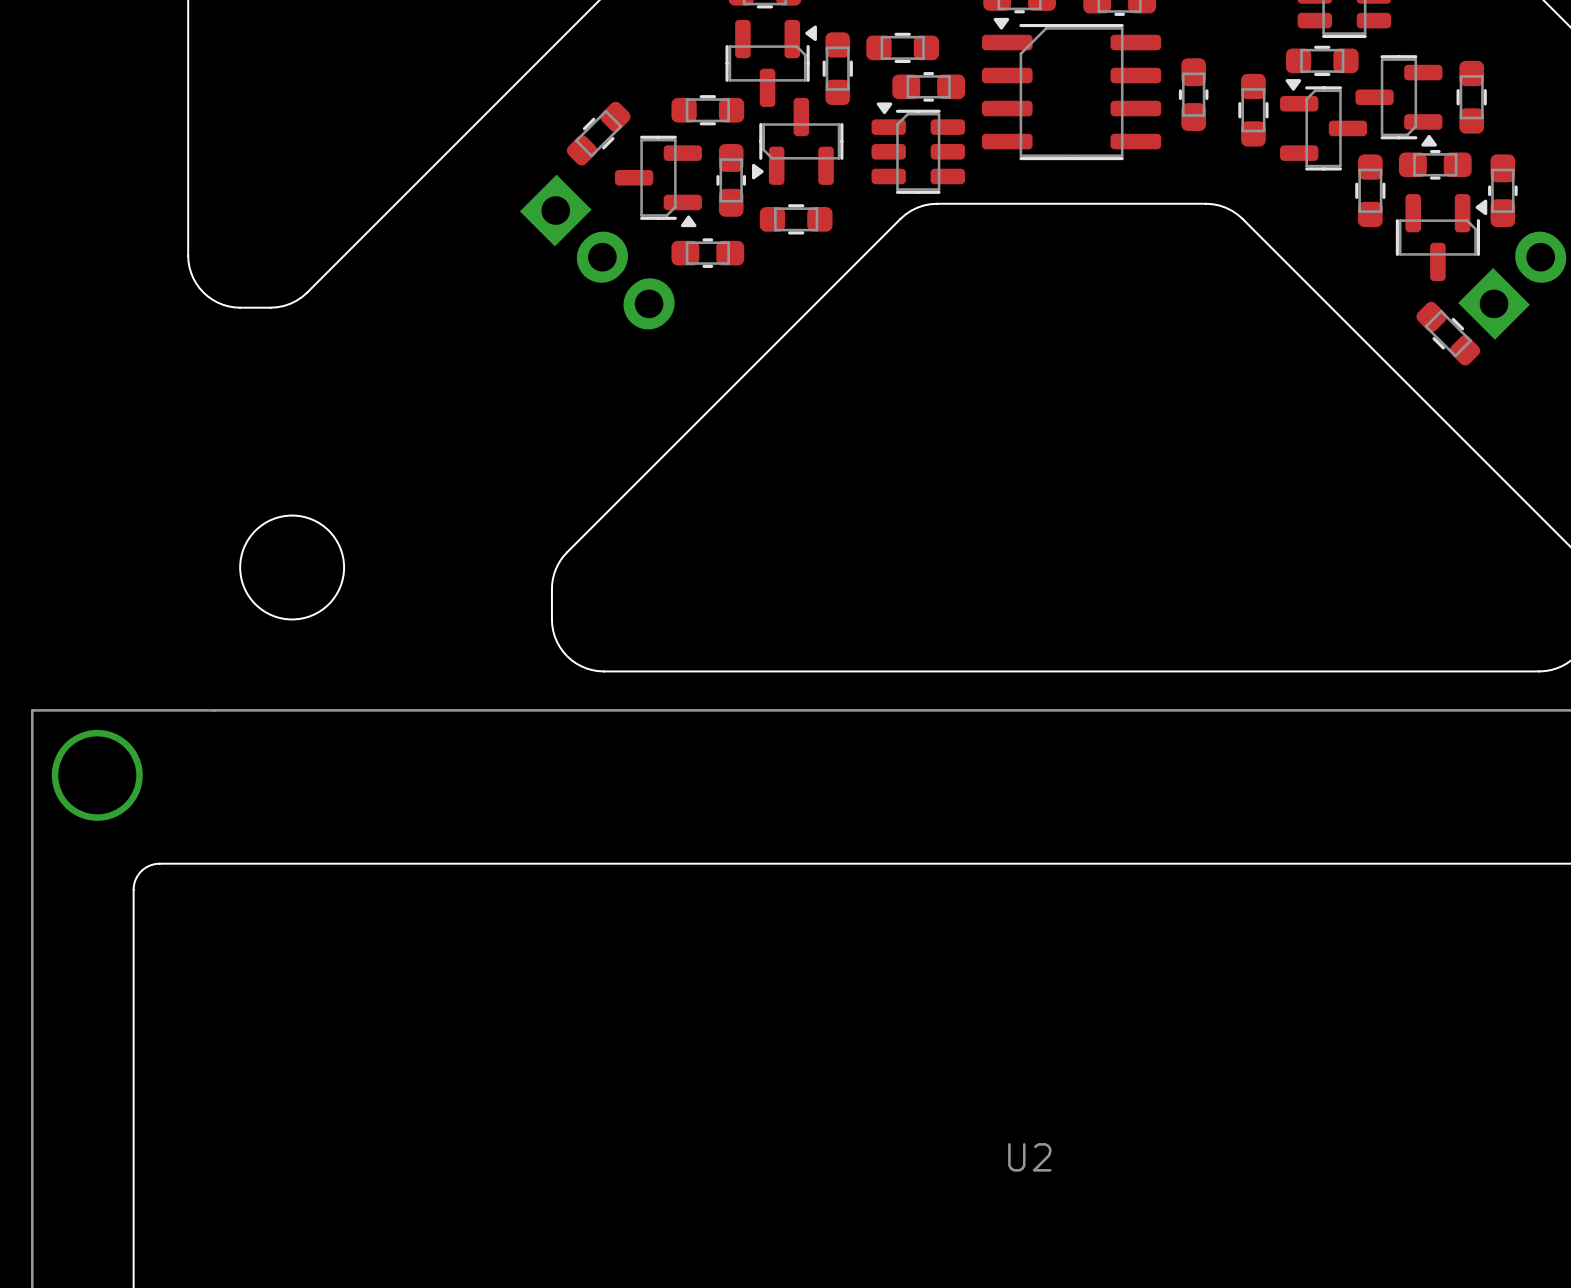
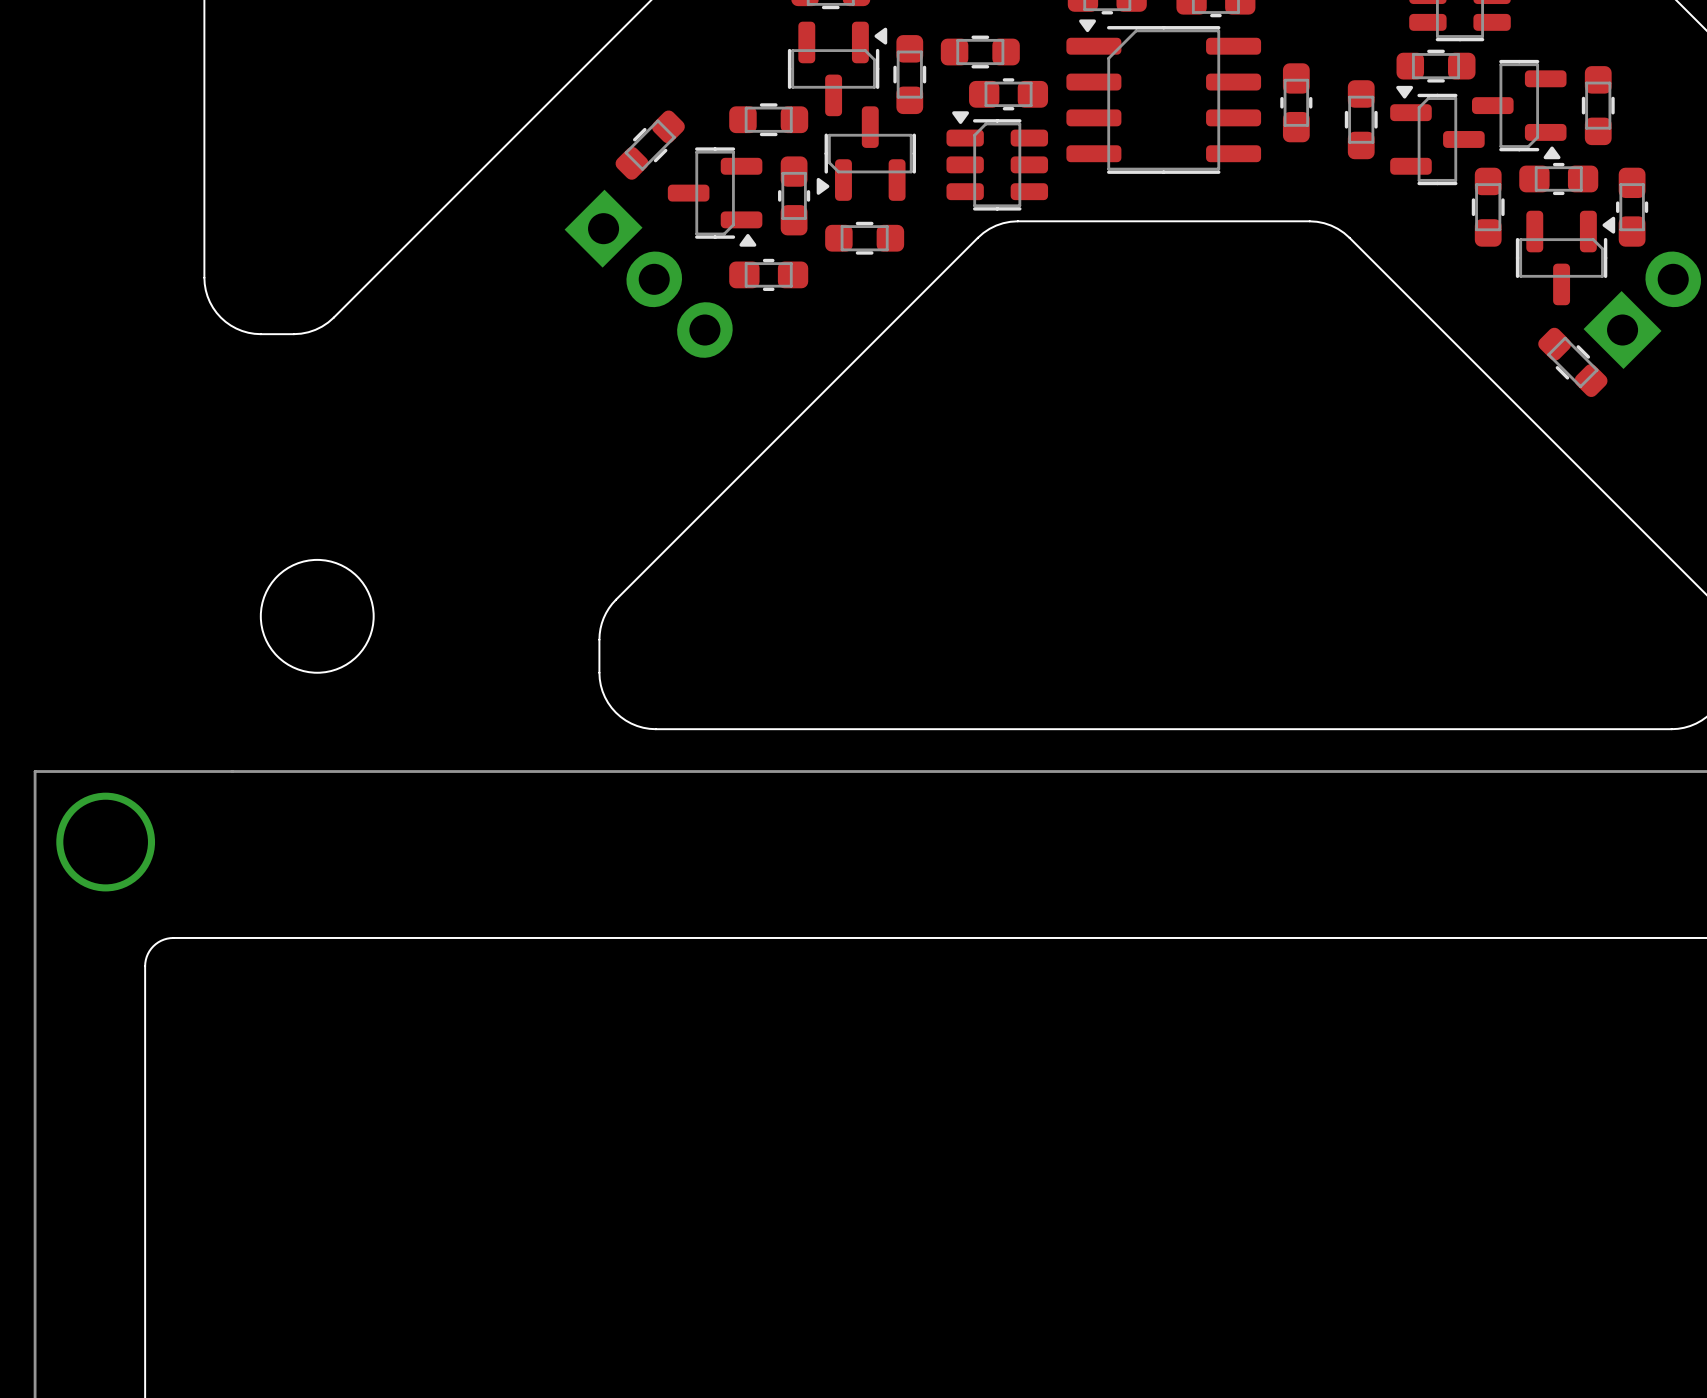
U2 name: U2 (1029, 1157) -> none

